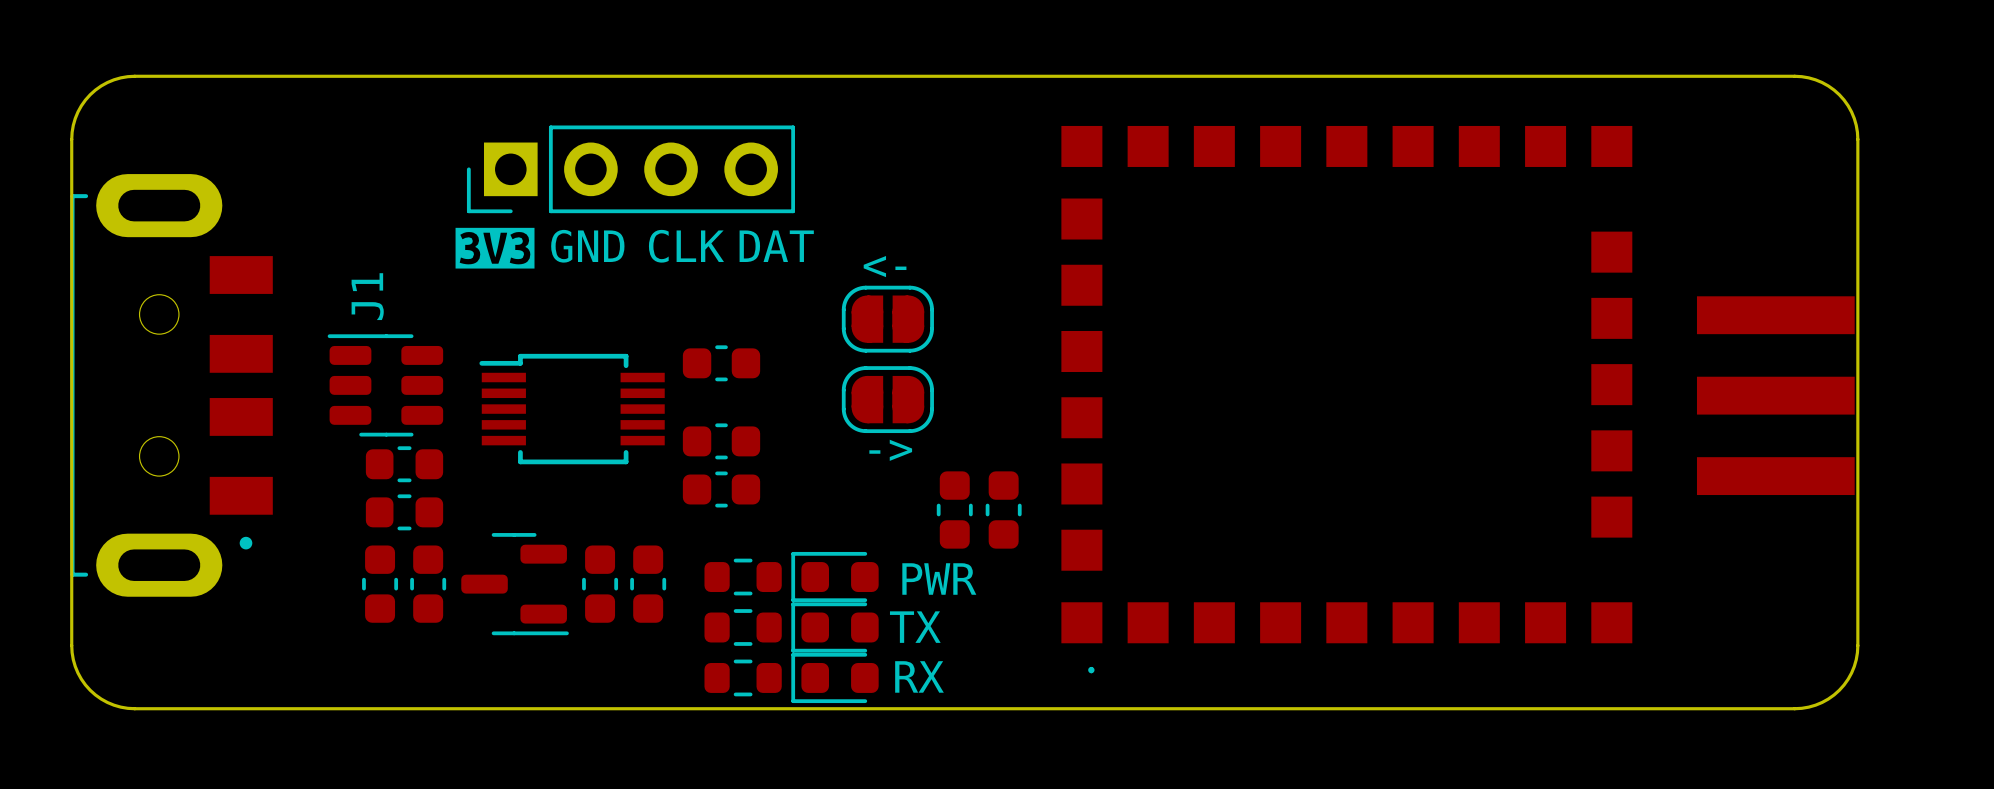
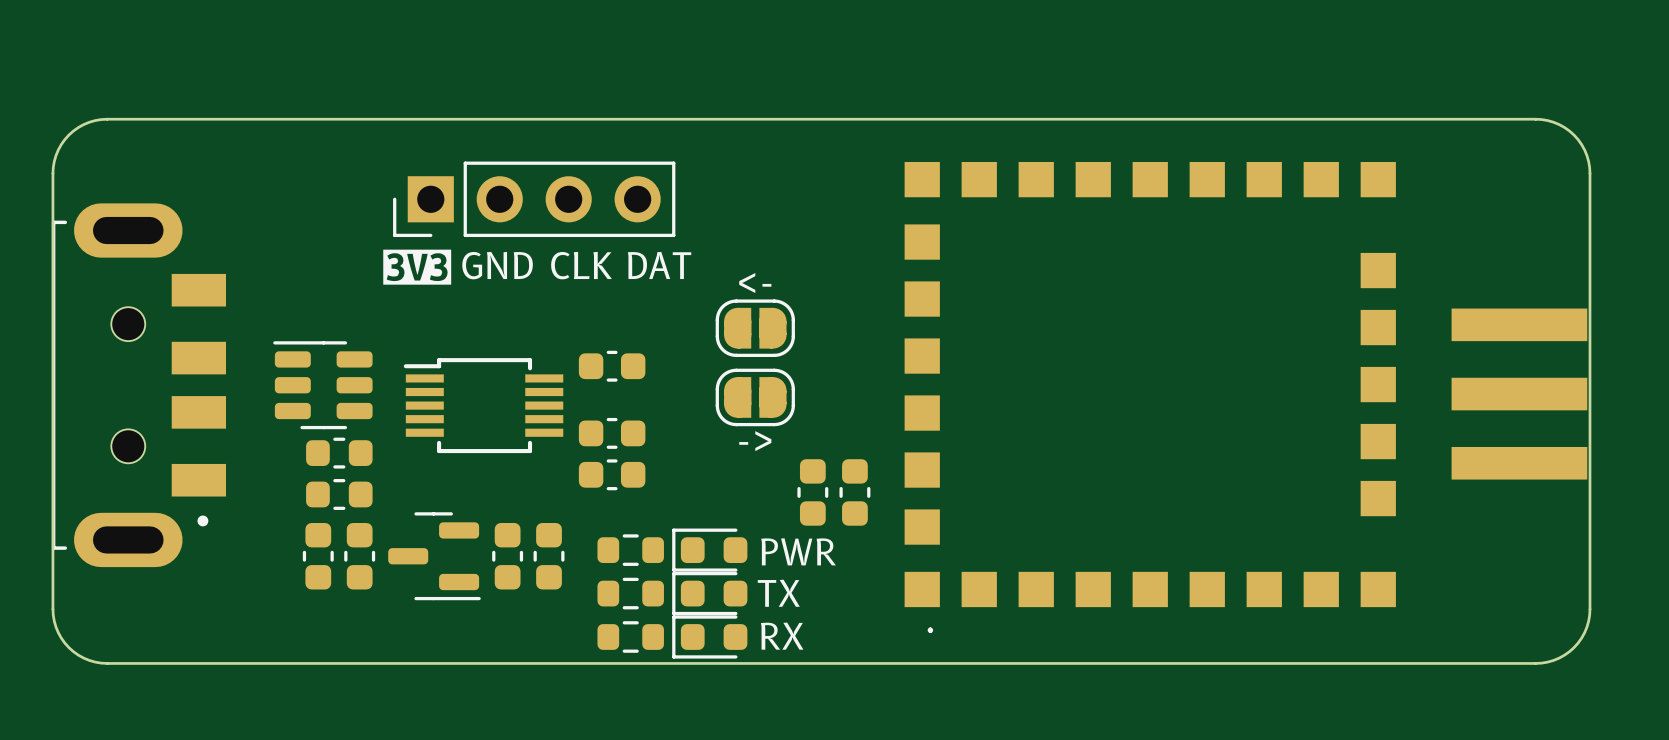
J1 name: J1 (367, 296) -> none

